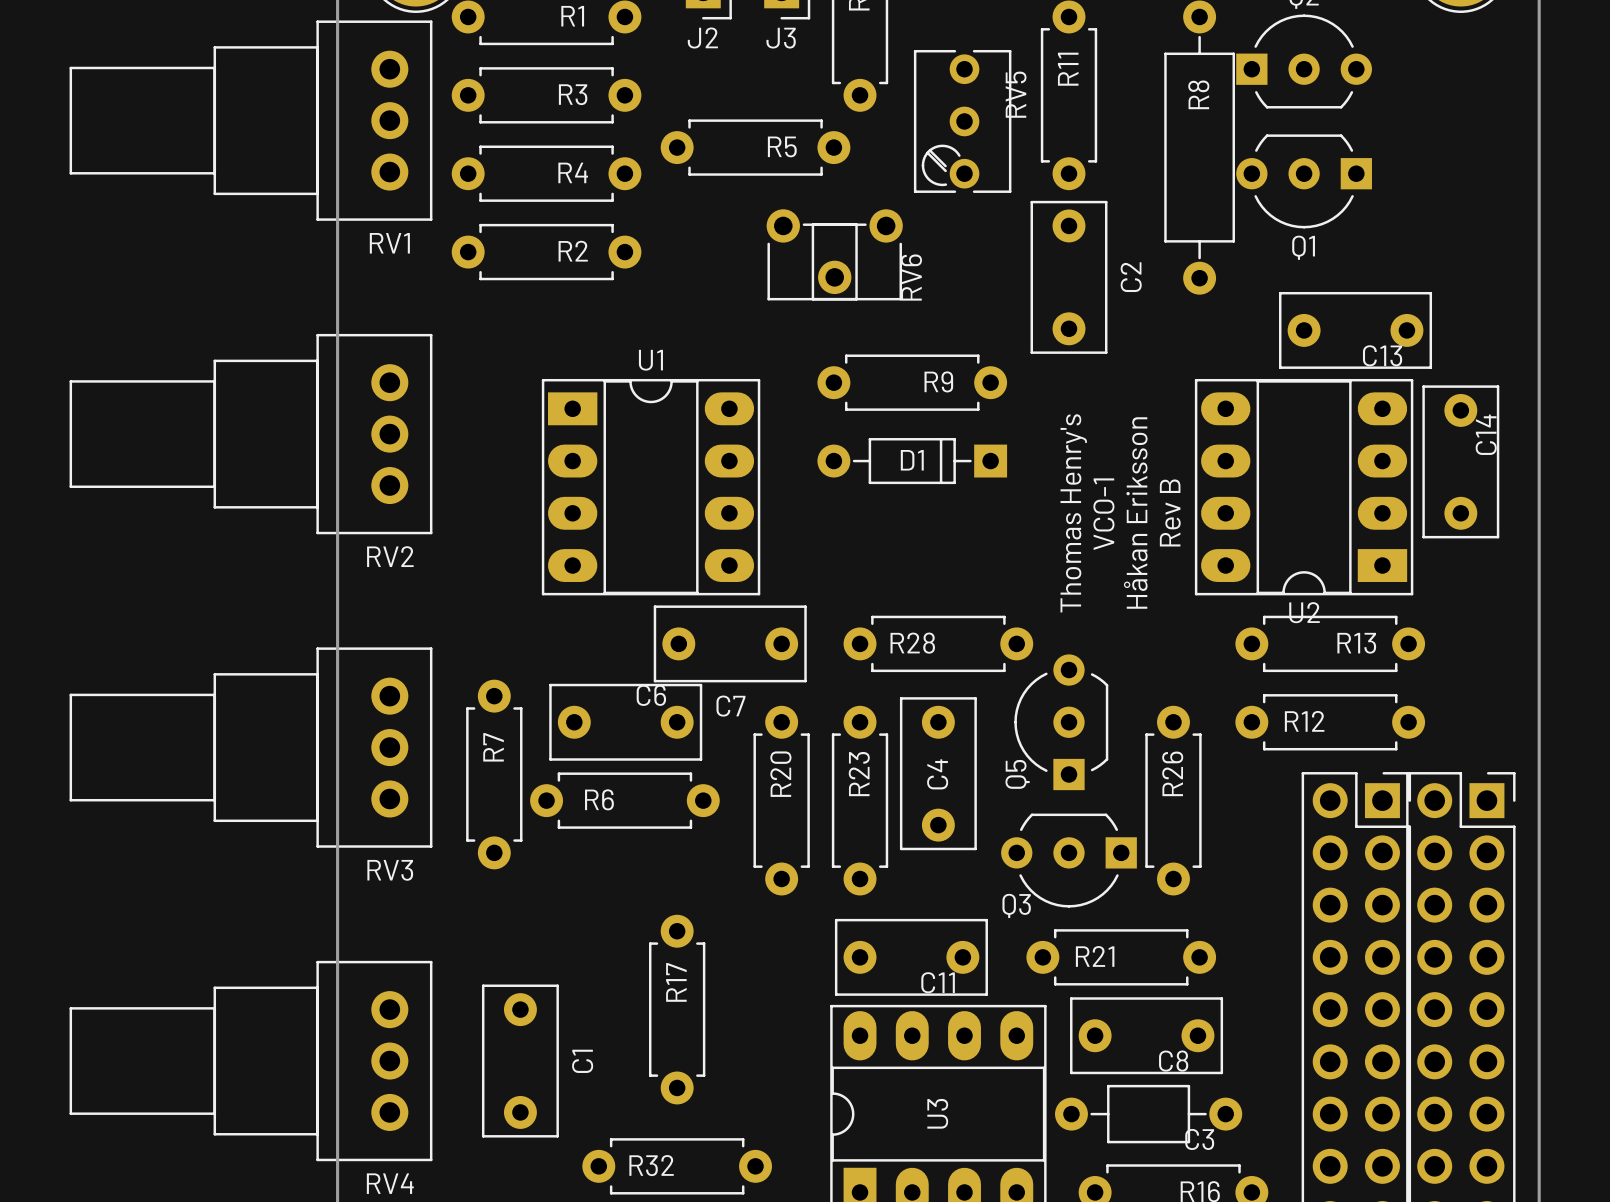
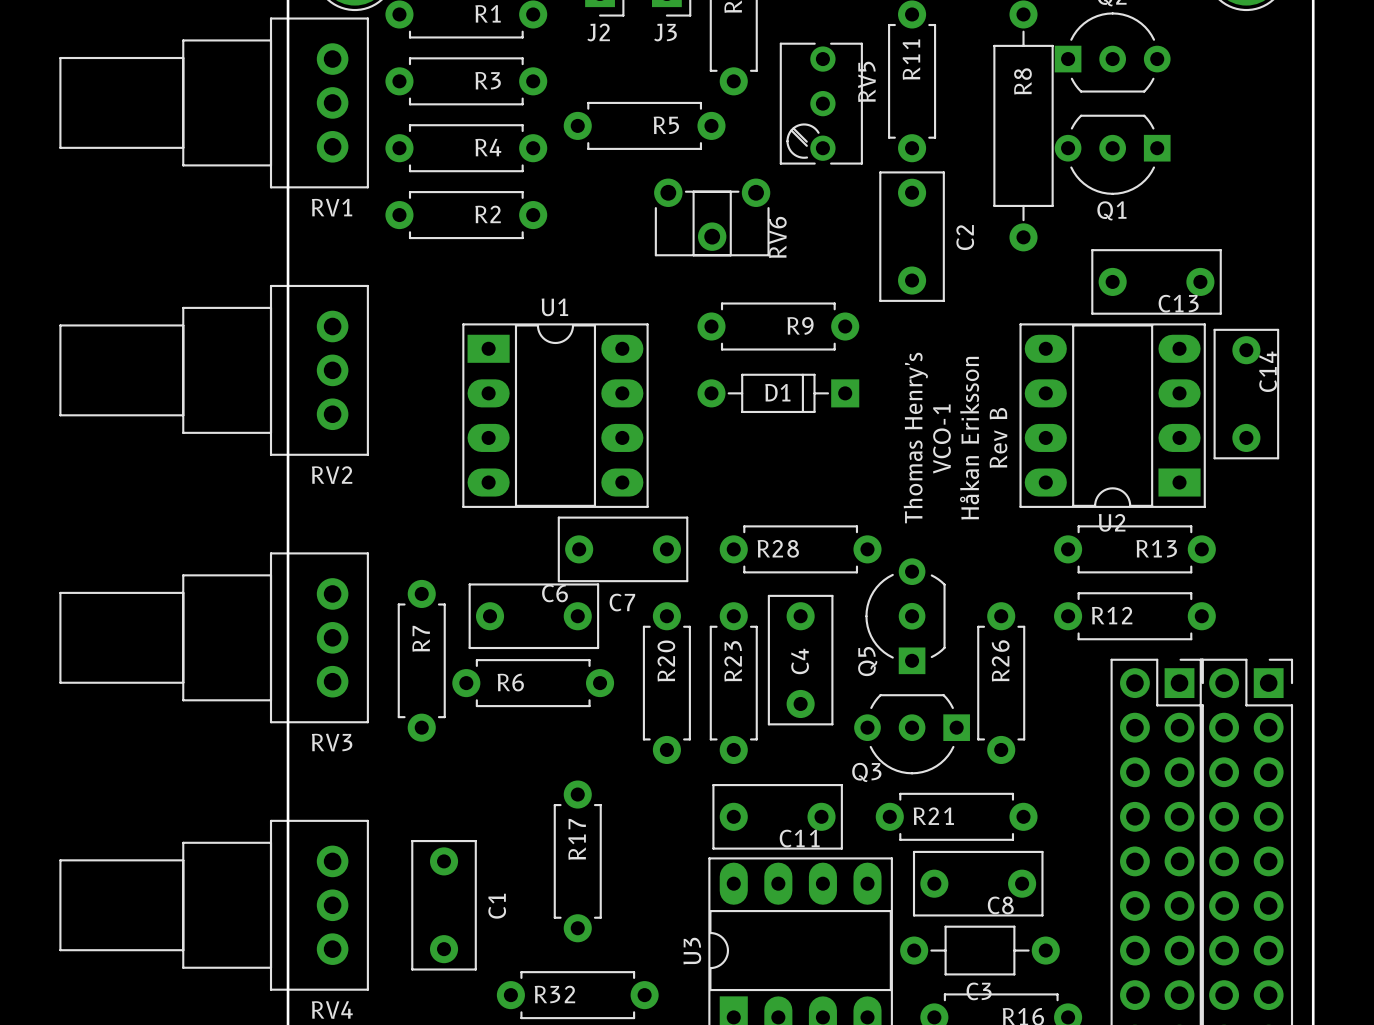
U3 name position: U3 (937, 1113) -> U3 (692, 951)
C3 name position: C3 (1199, 1139) -> C3 (979, 991)

